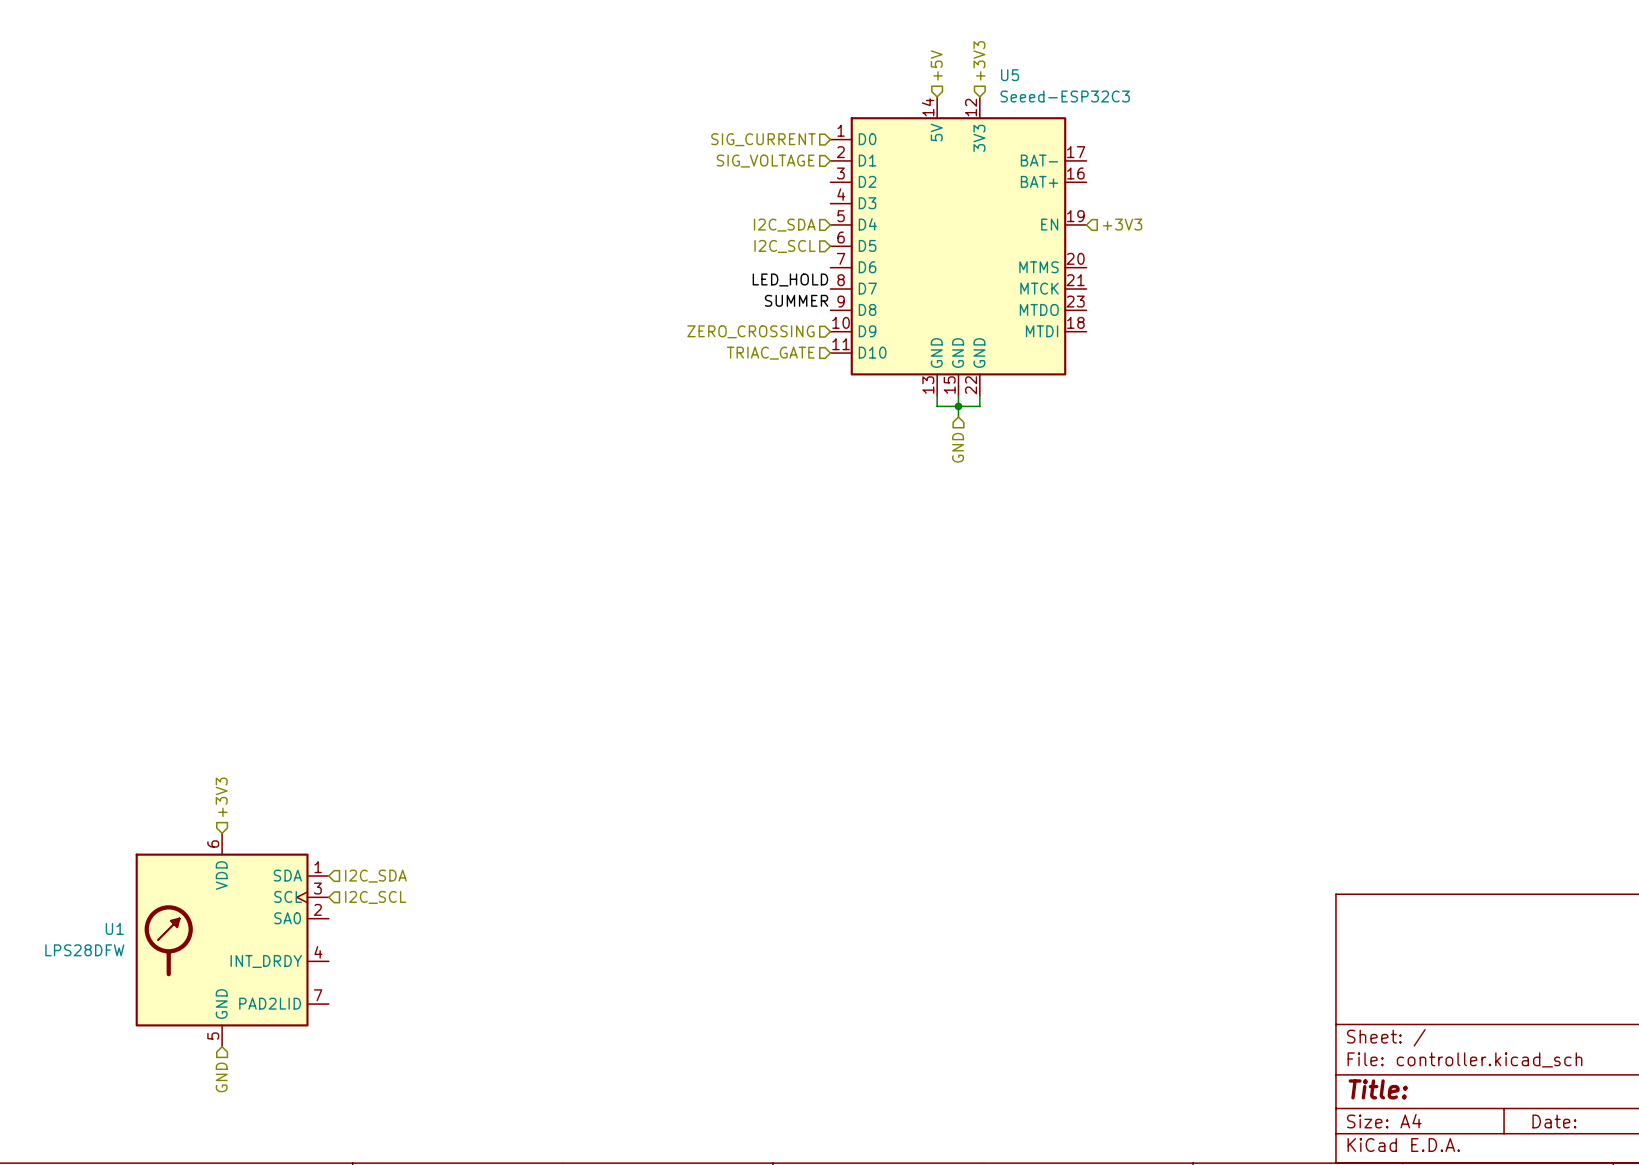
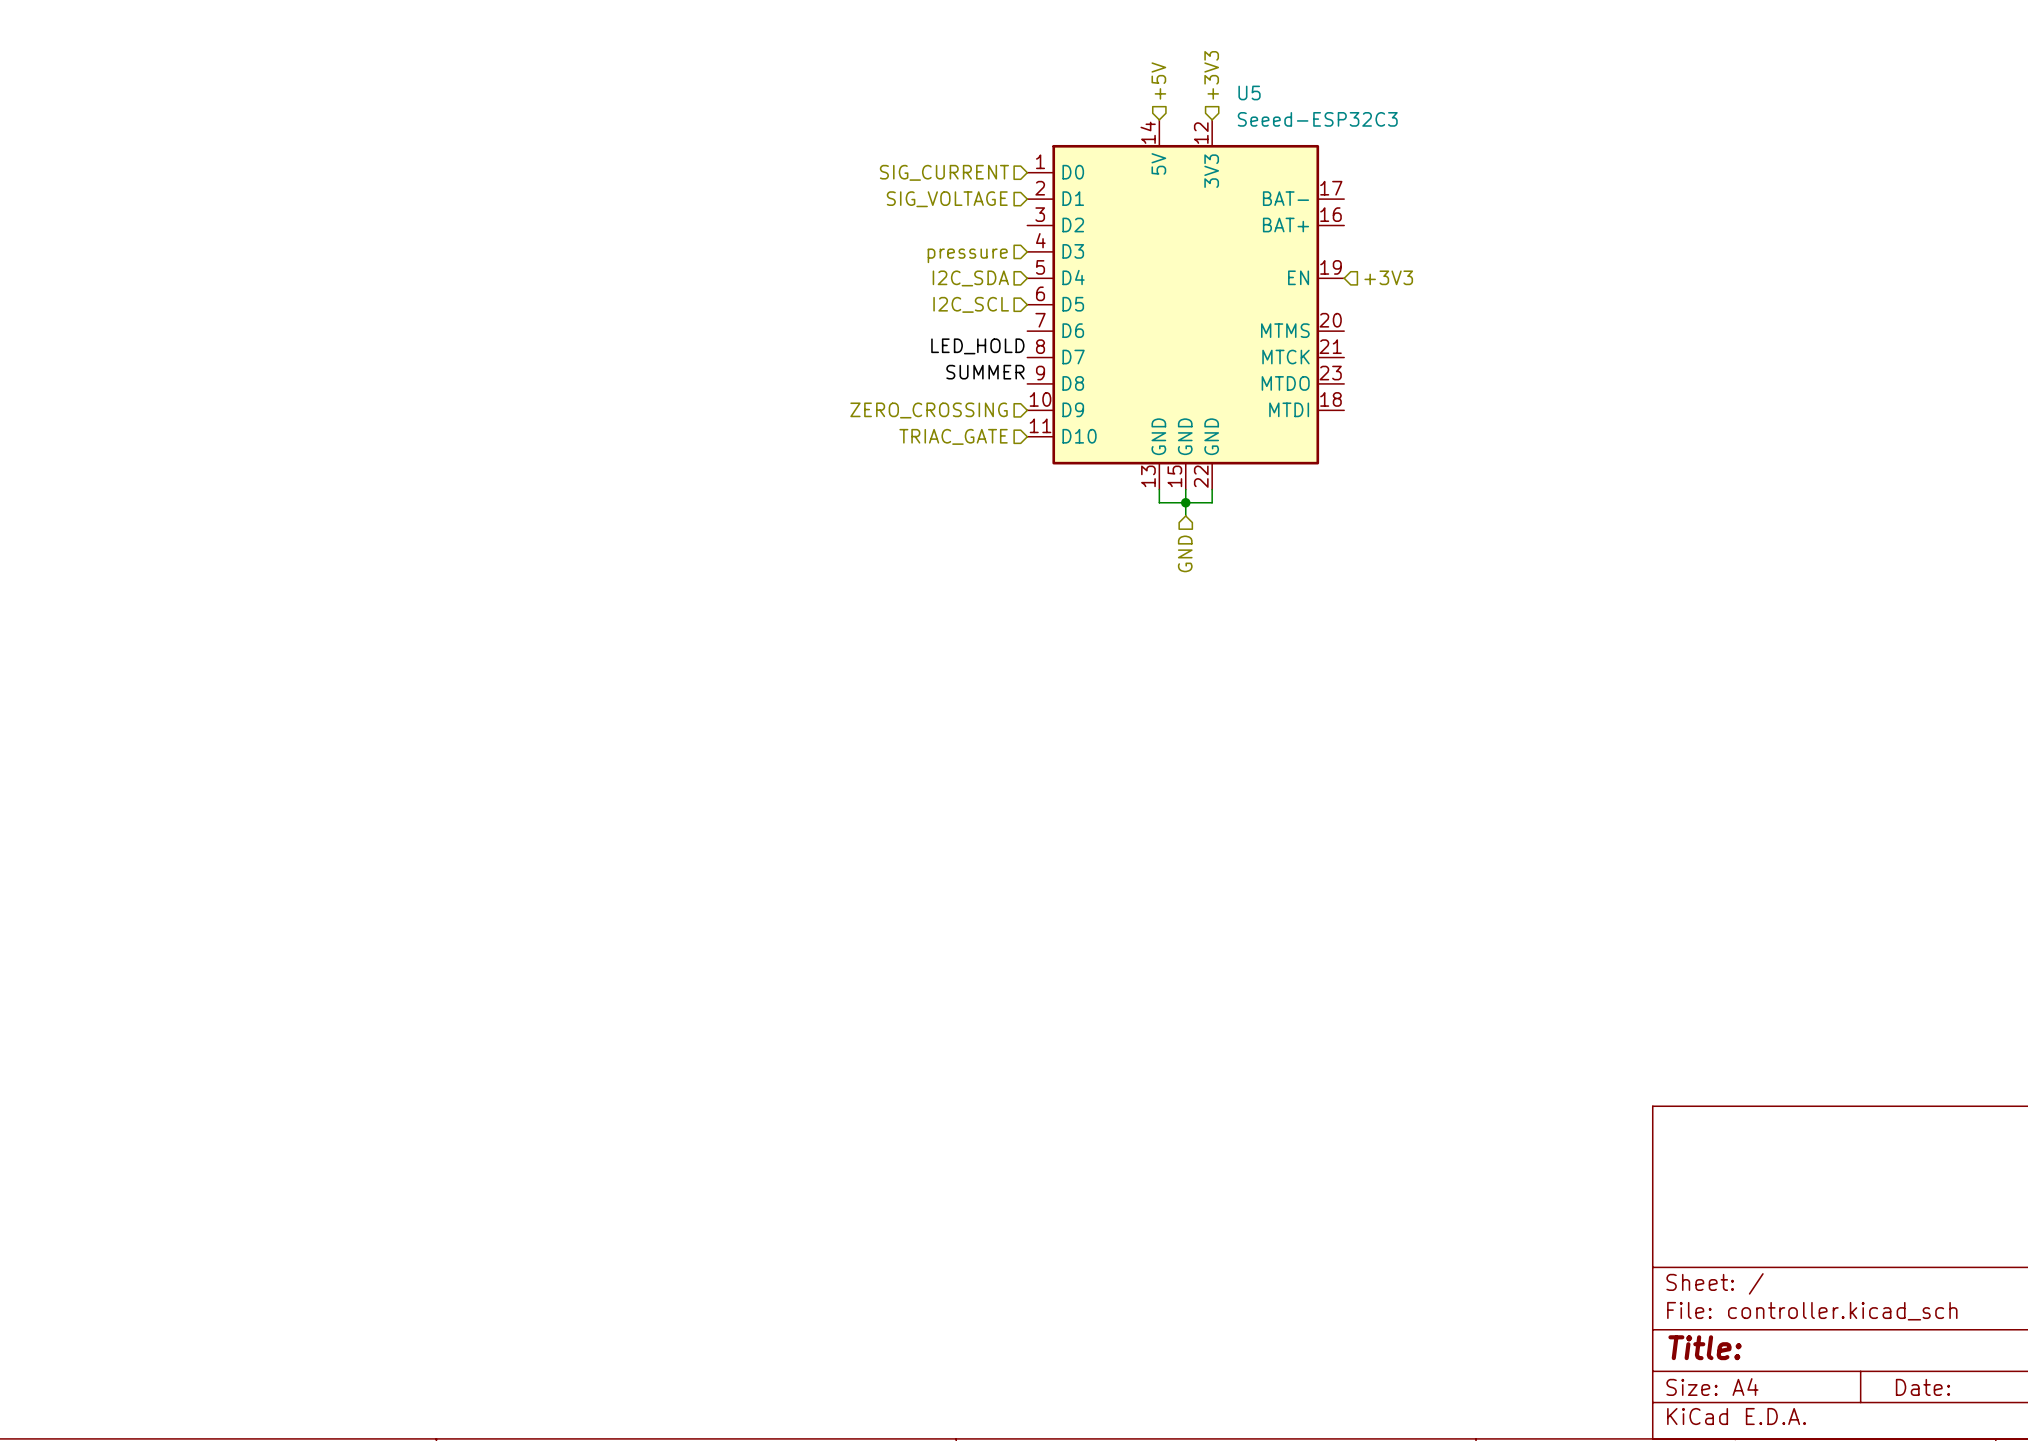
hierarchical label: none -> pressure (967, 255)
hierarchical label: +3V3 (221, 797) -> none
hierarchical label: I2C_SDA (375, 876) -> none
hierarchical label: I2C_SCL (375, 897) -> none
U1: LPS28DFW (232, 940) -> none
hierarchical label: GND (221, 1077) -> none

